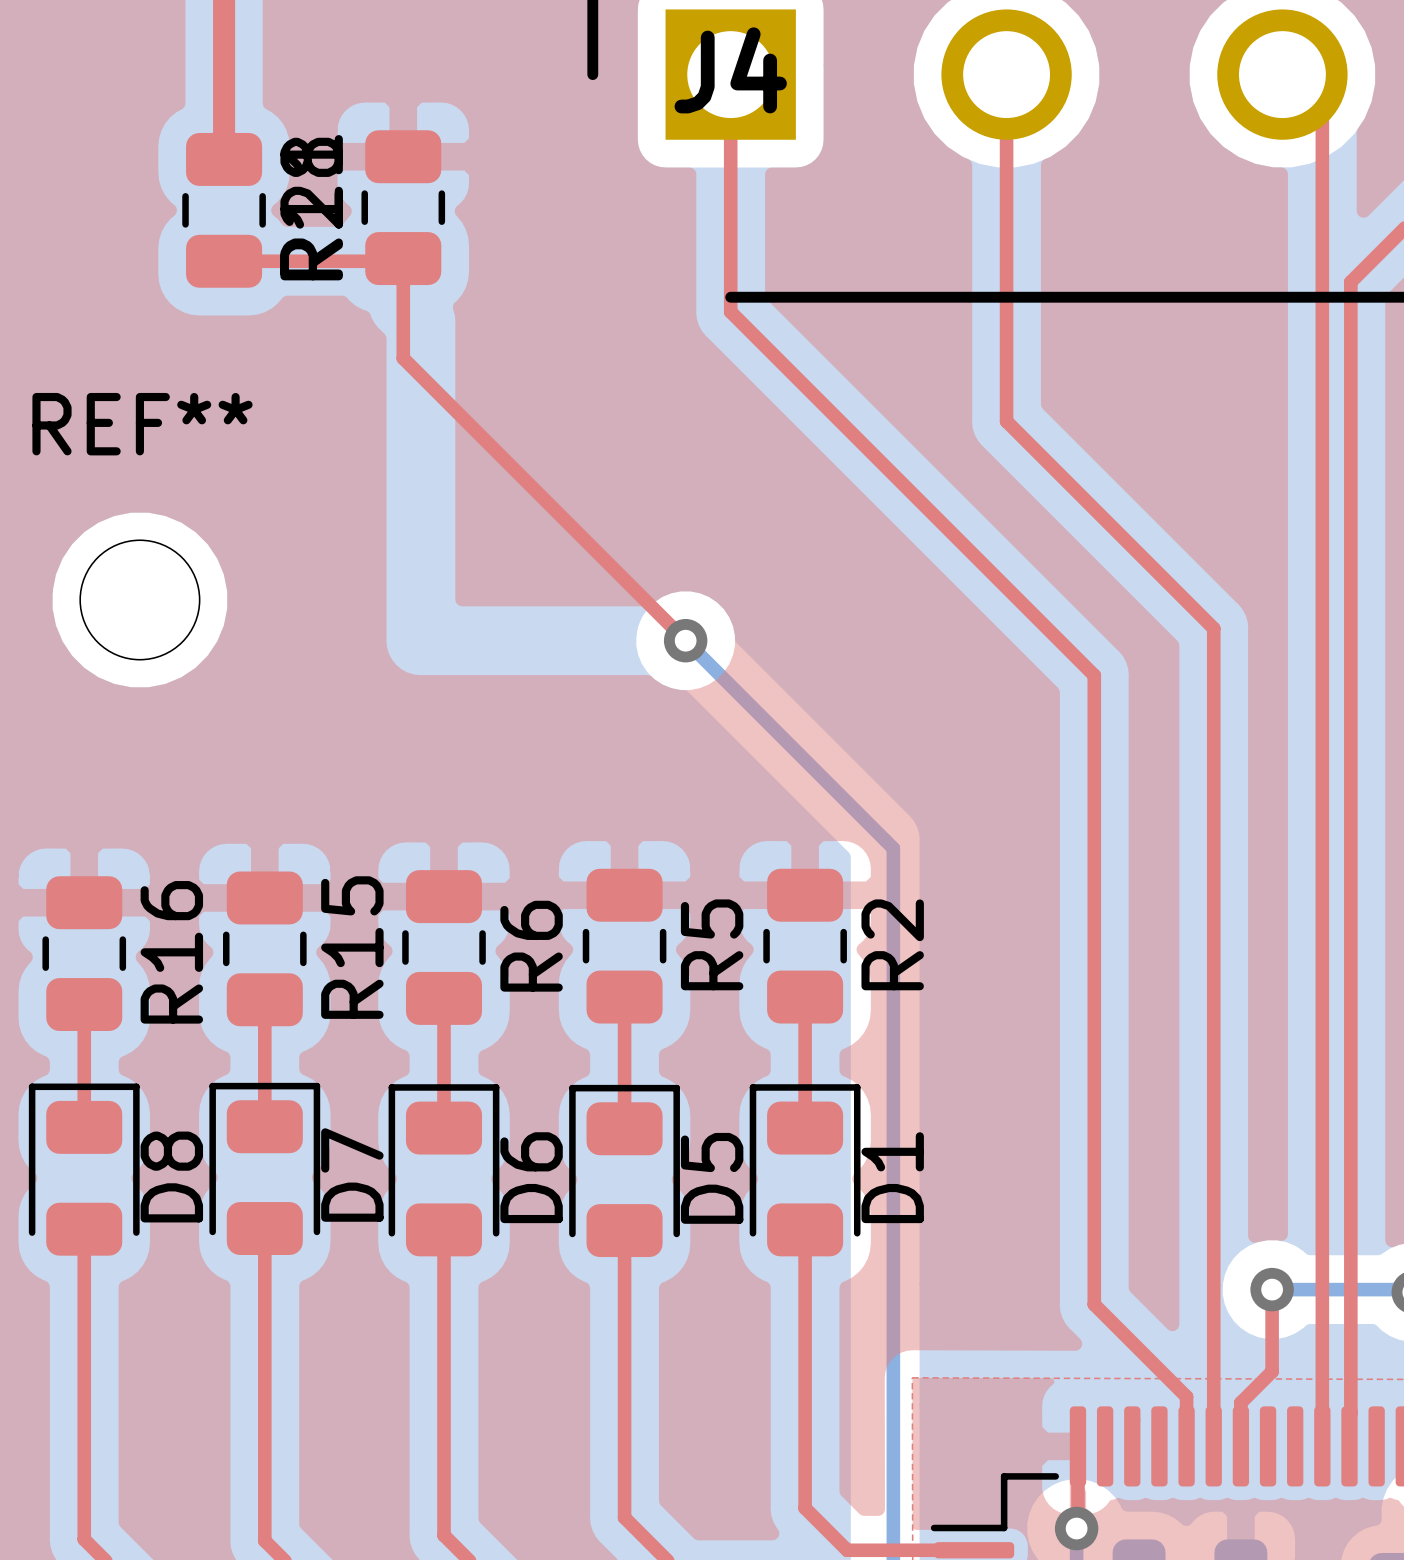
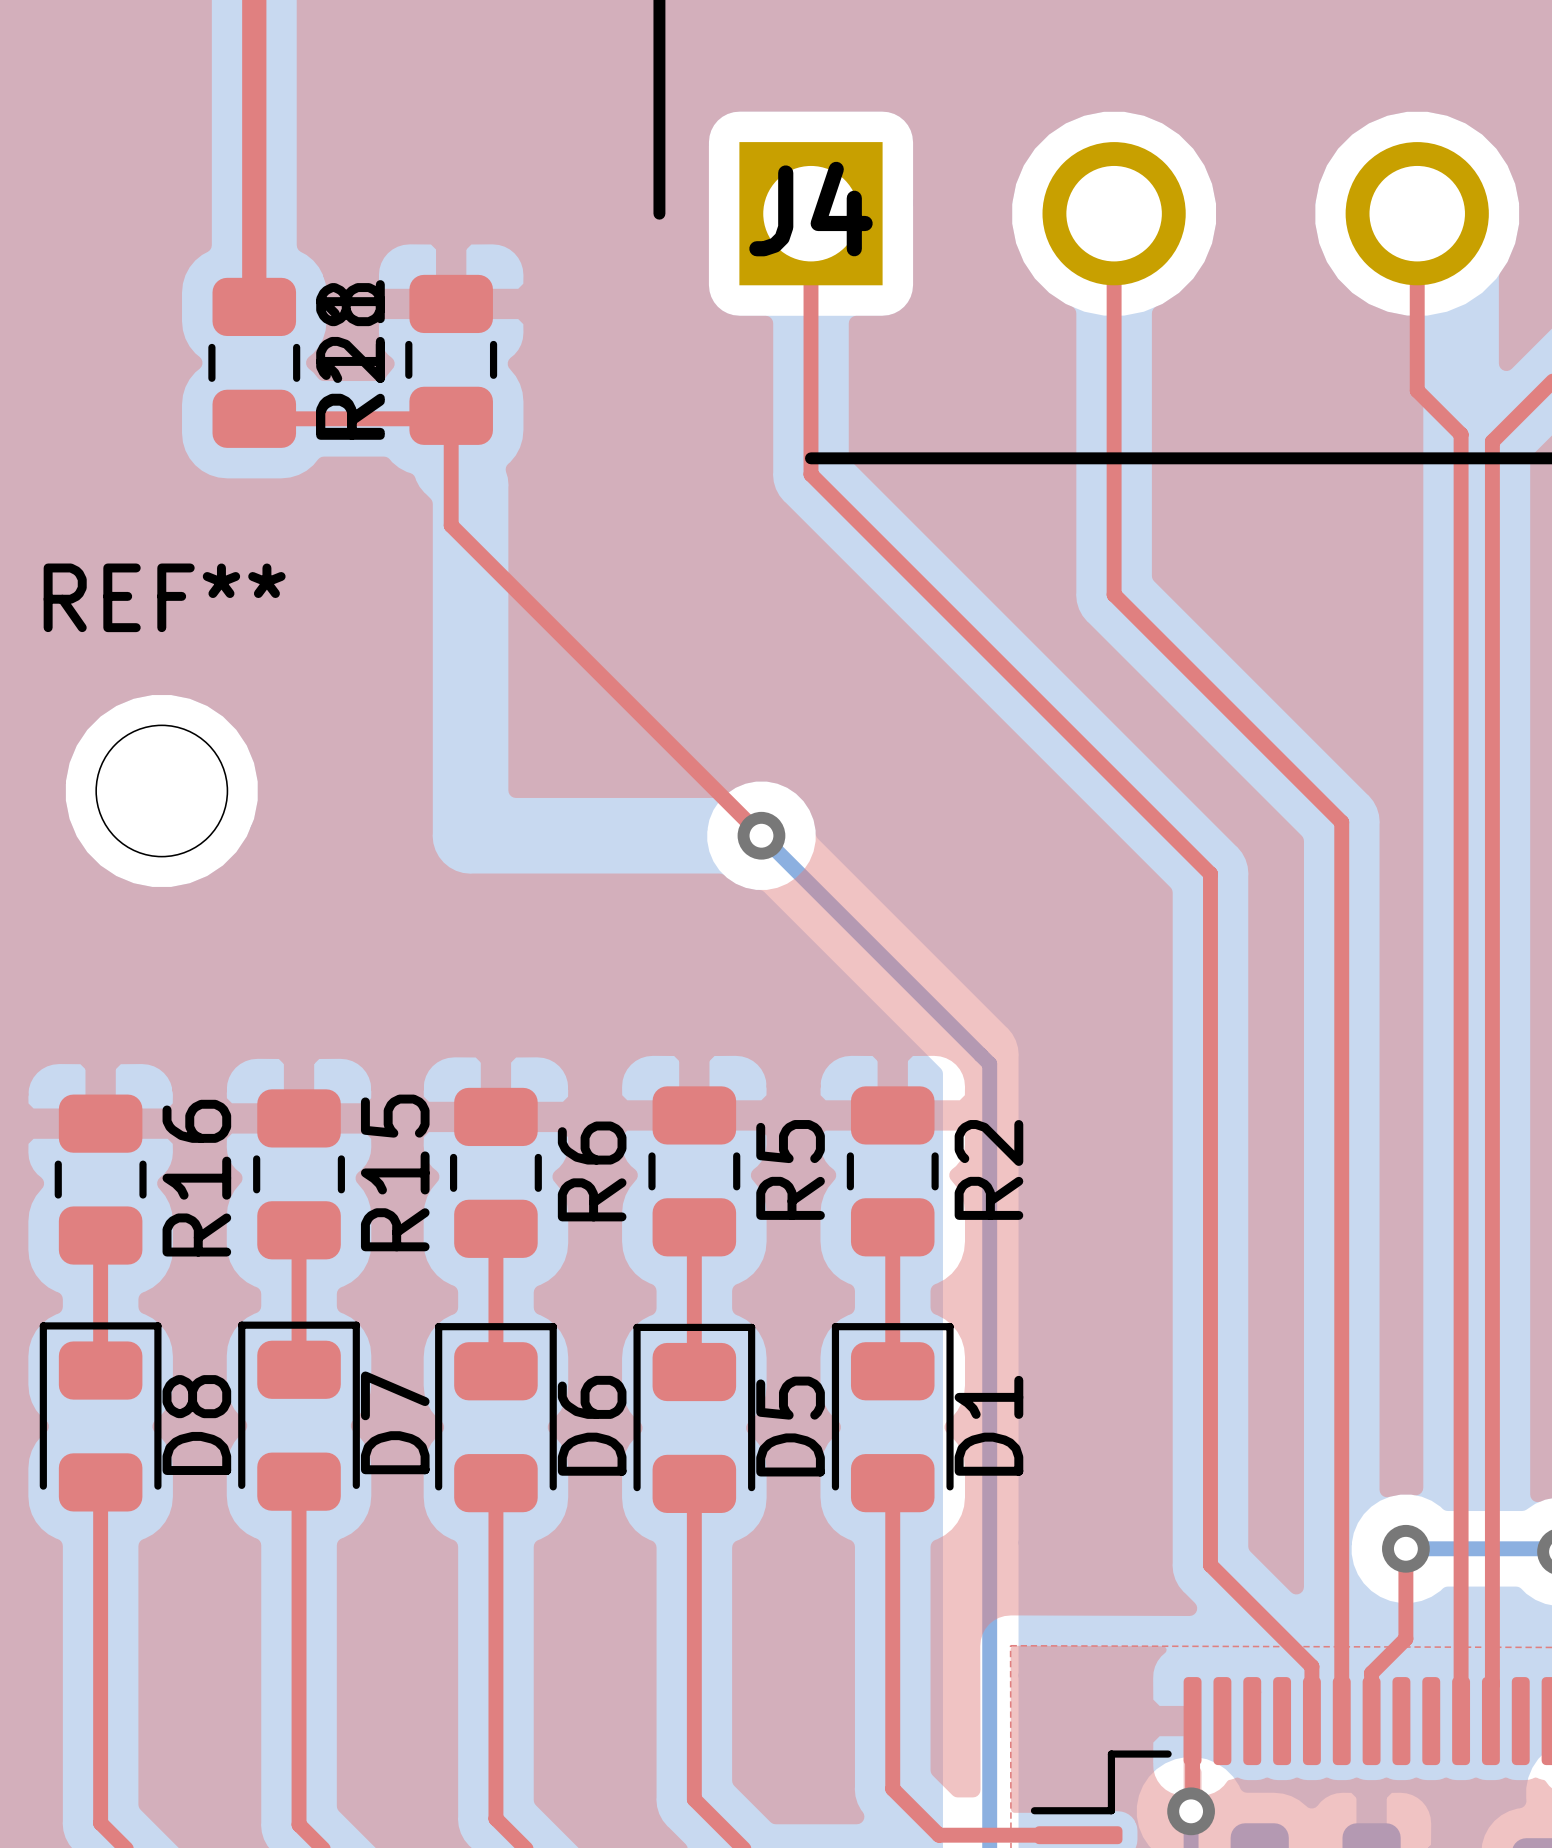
top track: (1282, 74) (1322, 114) (1322, 275) -> (1417, 213) (1417, 390) (1461, 434)

